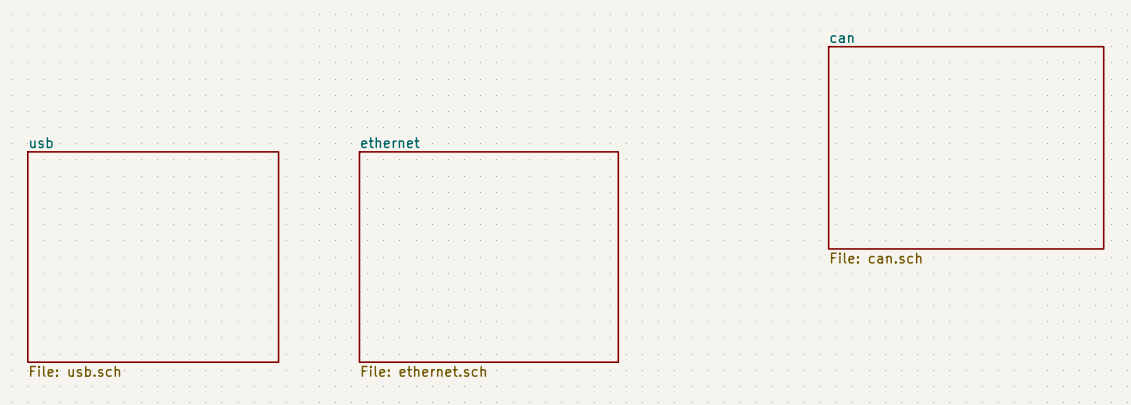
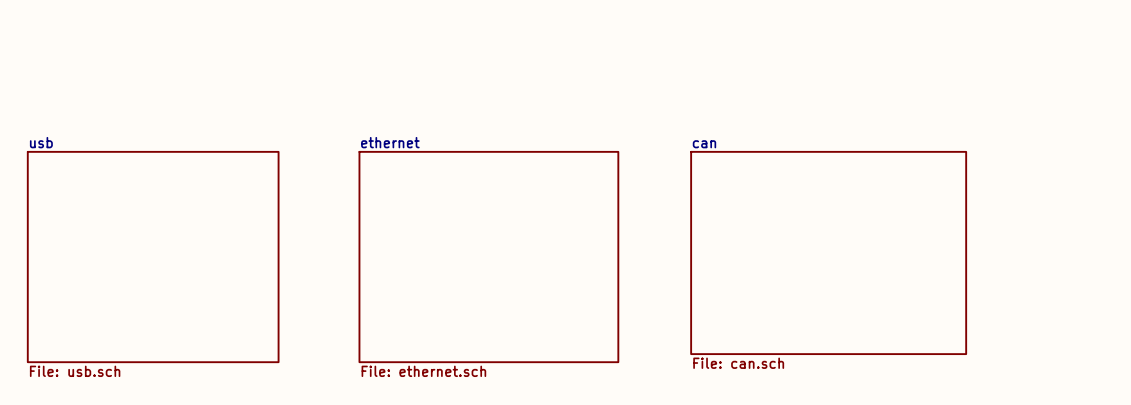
sheet can: File: can.sch (966, 147) -> none
sheet can: none -> File: can.sch (828, 252)

